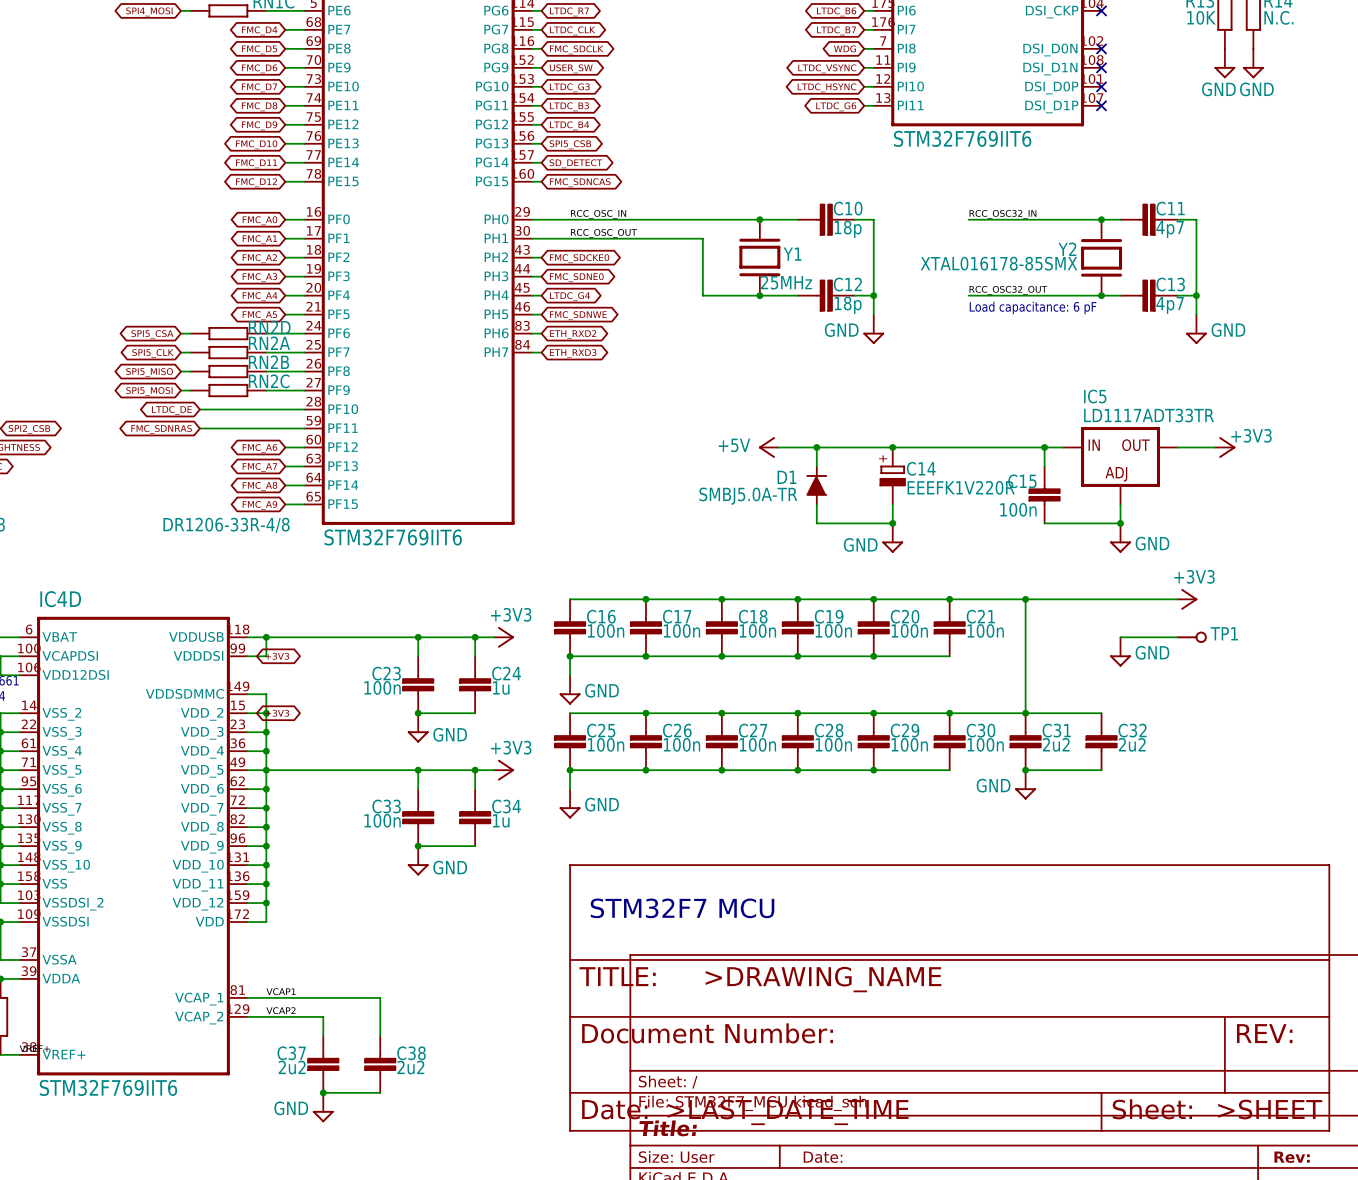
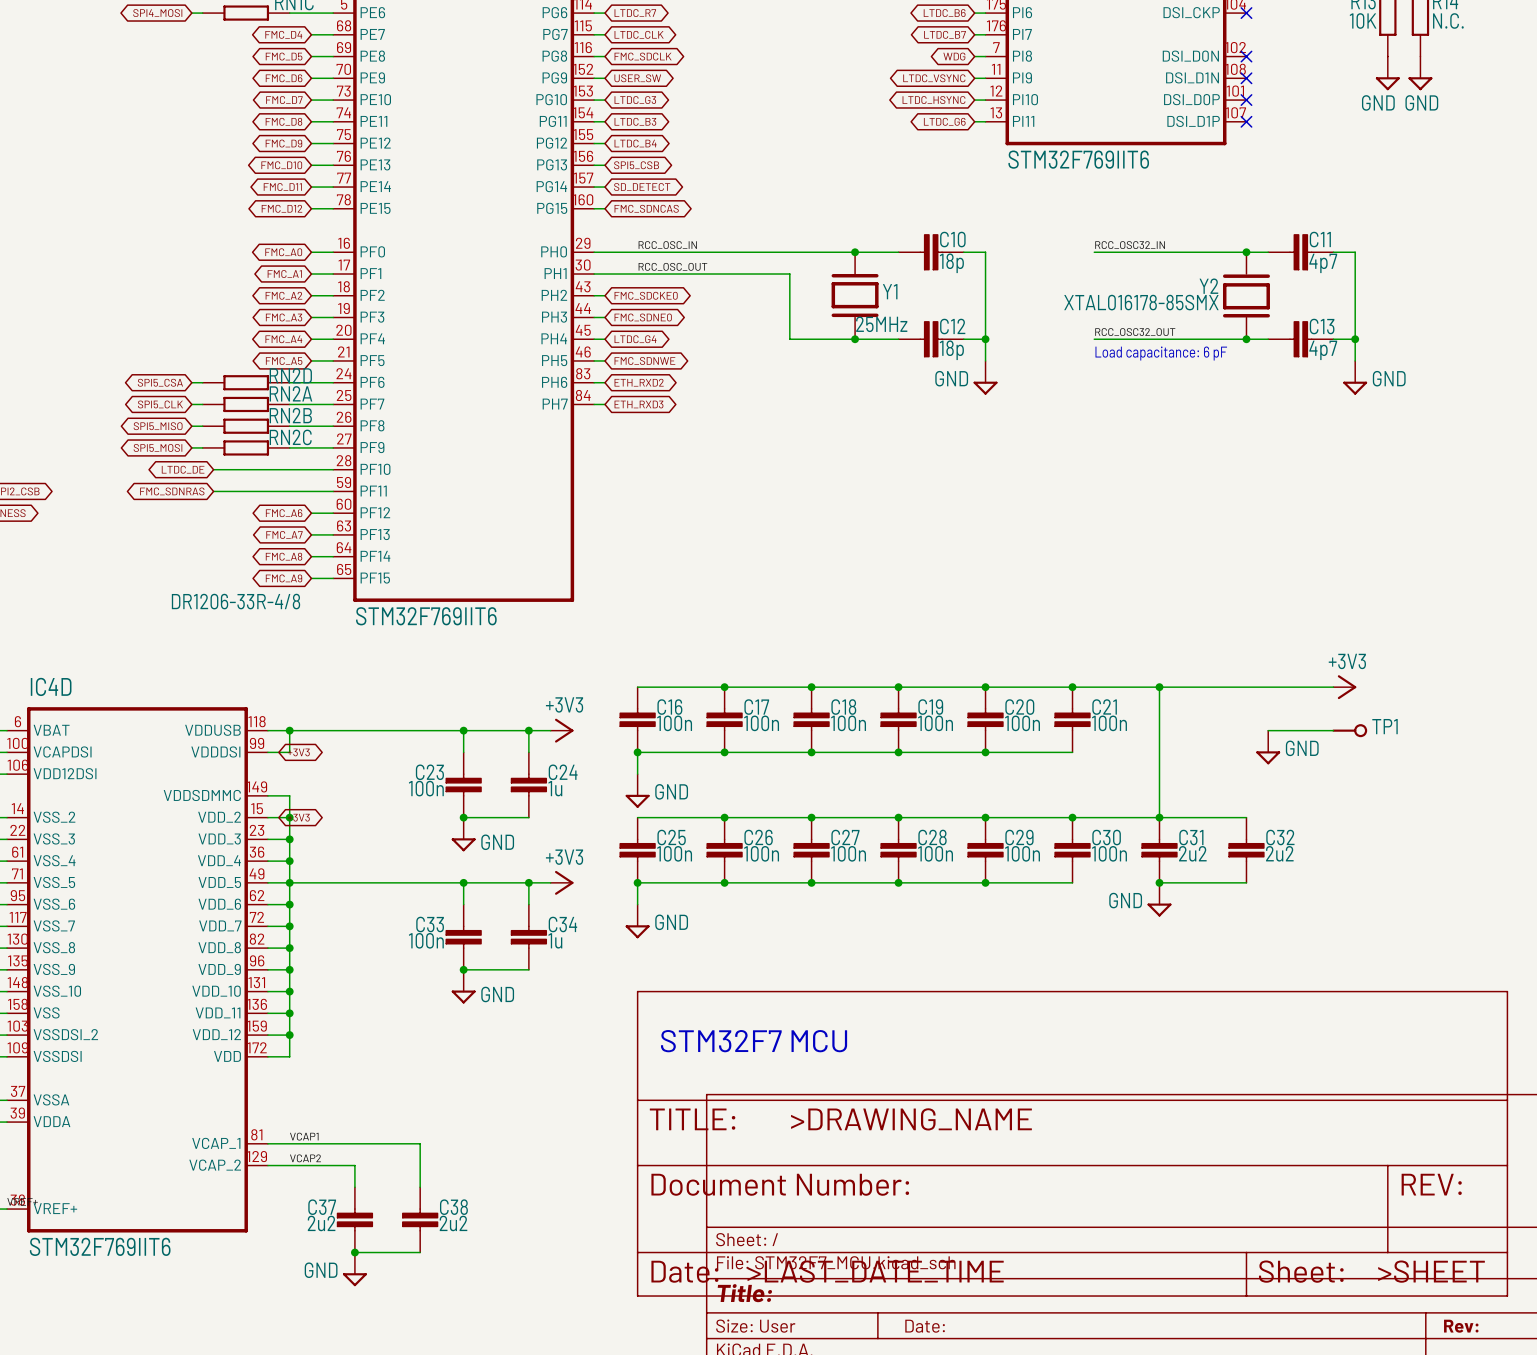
power symbol: +5V (768, 447) -> none
wire: (778, 447) (1063, 447) -> none
wire: (816, 447) (816, 466) -> none
junction: (816, 447) -> none
junction: (892, 447) -> none
wire: (1044, 447) (1044, 466) -> none
junction: (1044, 447) -> none
wire: (1177, 447) (1215, 447) -> none
power symbol: +3V3 (1225, 447) -> none
IC5: LD1117ADT33TR (1120, 465) -> none
C14: EEEFK1V220R (892, 475) -> none
D1: SMBJ5.0A-TR (816, 485) -> none
C15: 100n (1044, 494) -> none
wire: (816, 504) (816, 523) (892, 523) (892, 504) -> none
wire: (1120, 504) (1120, 523) (1044, 523) -> none
junction: (892, 523) -> none
junction: (1120, 523) -> none
power symbol: GND (892, 538) -> none
power symbol: GND (1120, 538) -> none

